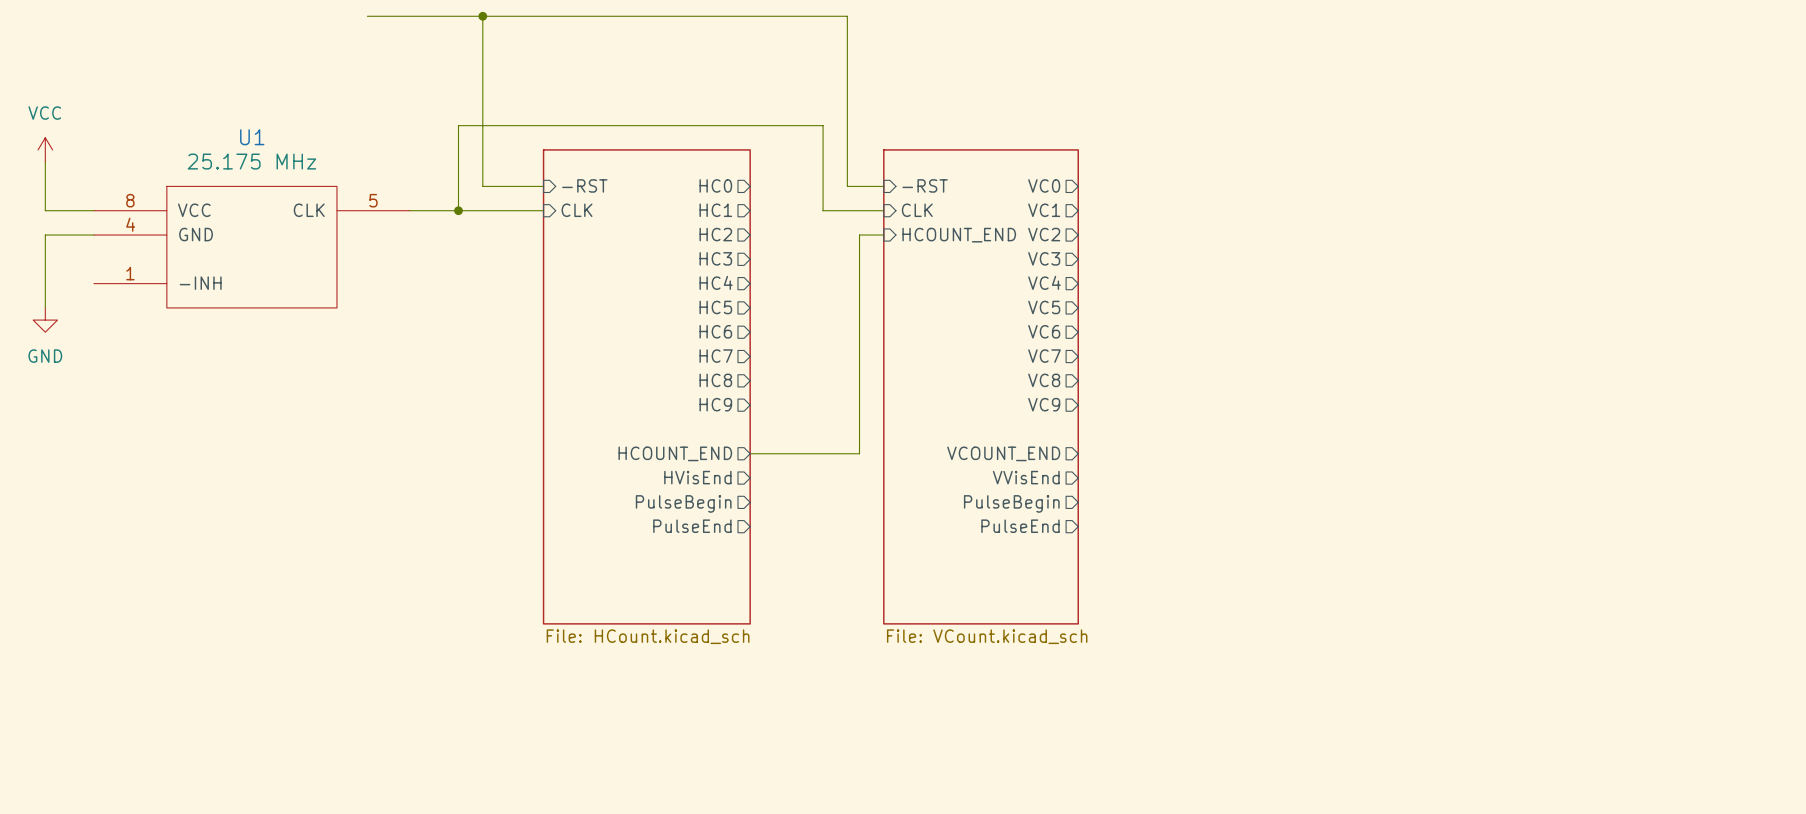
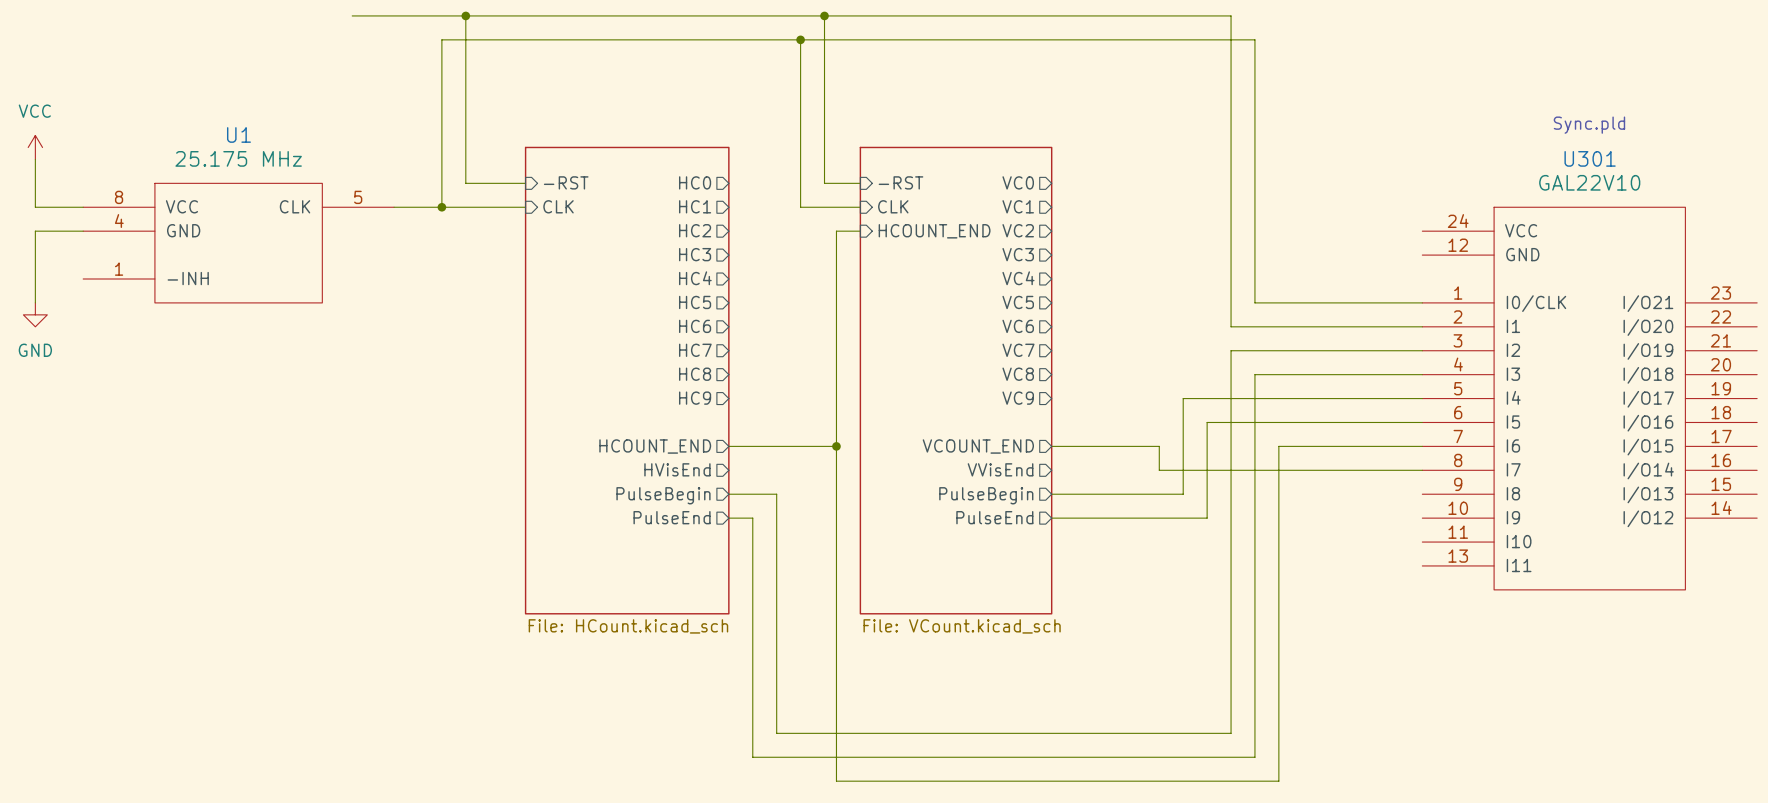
wire: none -> (824, 15) (1231, 15) (1231, 326) (1422, 326)
junction: none -> (824, 15)
junction: none -> (800, 39)
wire: (458, 125) (823, 125) -> (800, 39) (800, 123)
wire: none -> (441, 123) (441, 39) (1254, 39) (1254, 302) (1422, 302)
text: none -> Sync.pld (1589, 125)
wire: none -> (1422, 350) (1231, 350) (1231, 733) (776, 733) (776, 494) (728, 494)
wire: none -> (1422, 374) (1254, 374) (1254, 757) (752, 757) (752, 518) (728, 518)
wire: none -> (1422, 398) (1183, 398) (1183, 494) (1051, 494)
U301: none -> GAL22V10 (1589, 398)
wire: none -> (1422, 422) (1207, 422) (1207, 518) (1051, 518)
wire: none -> (836, 446) (836, 781) (1278, 781) (1278, 446) (1422, 446)
junction: none -> (836, 446)
wire: none -> (1051, 446) (1159, 446) (1159, 470) (1422, 470)

